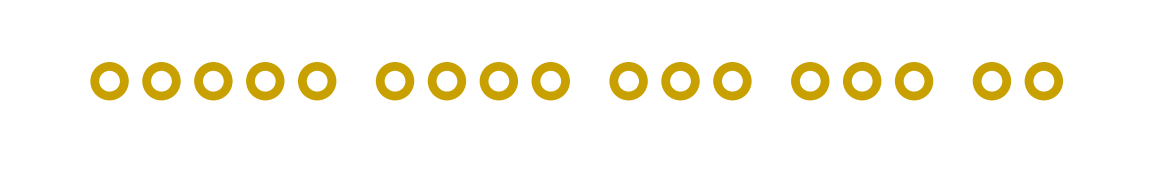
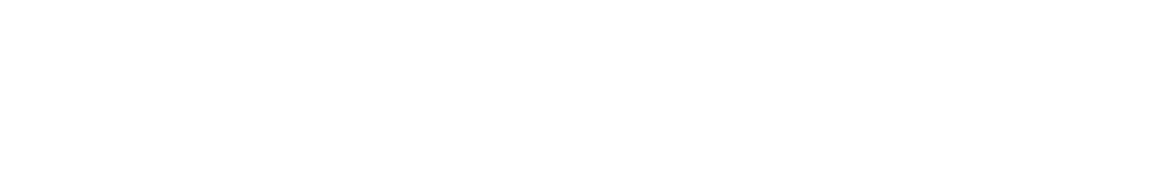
part: (213, 81) -> none
part: (472, 81) -> none
part: (680, 81) -> none
part: (862, 81) -> none
part: (1017, 81) -> none

